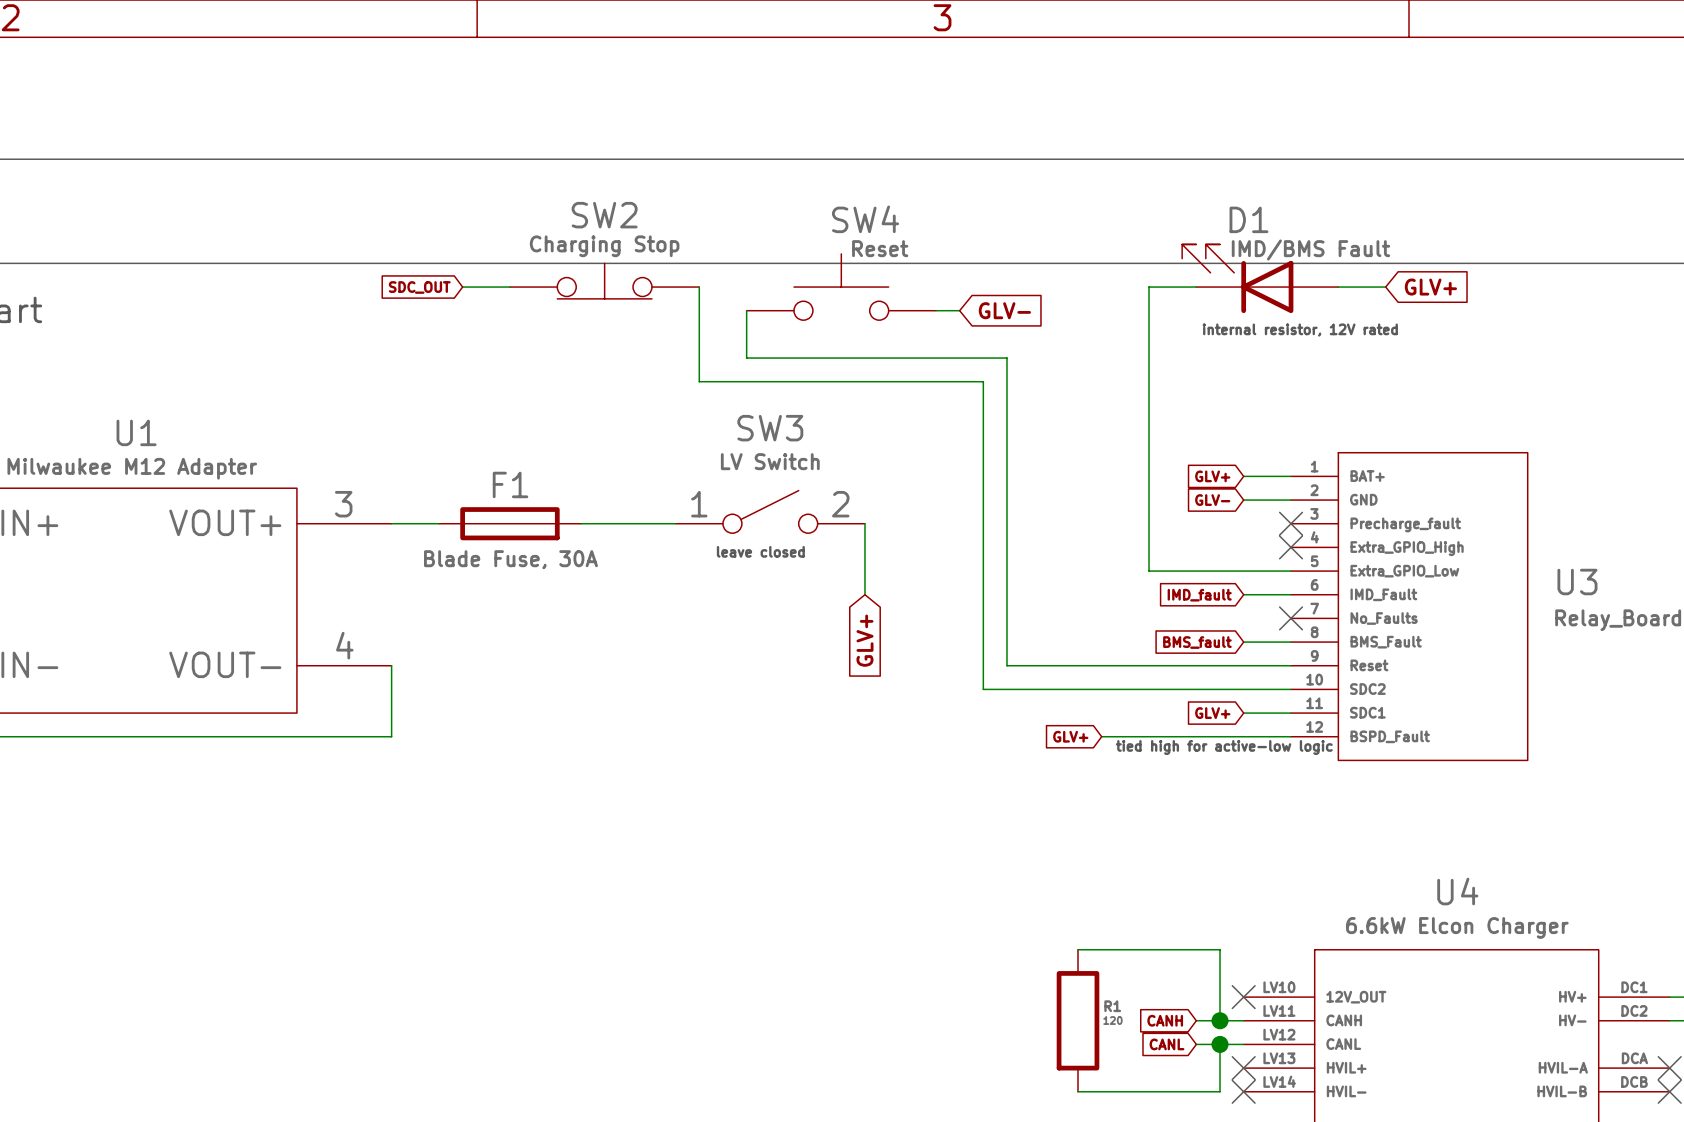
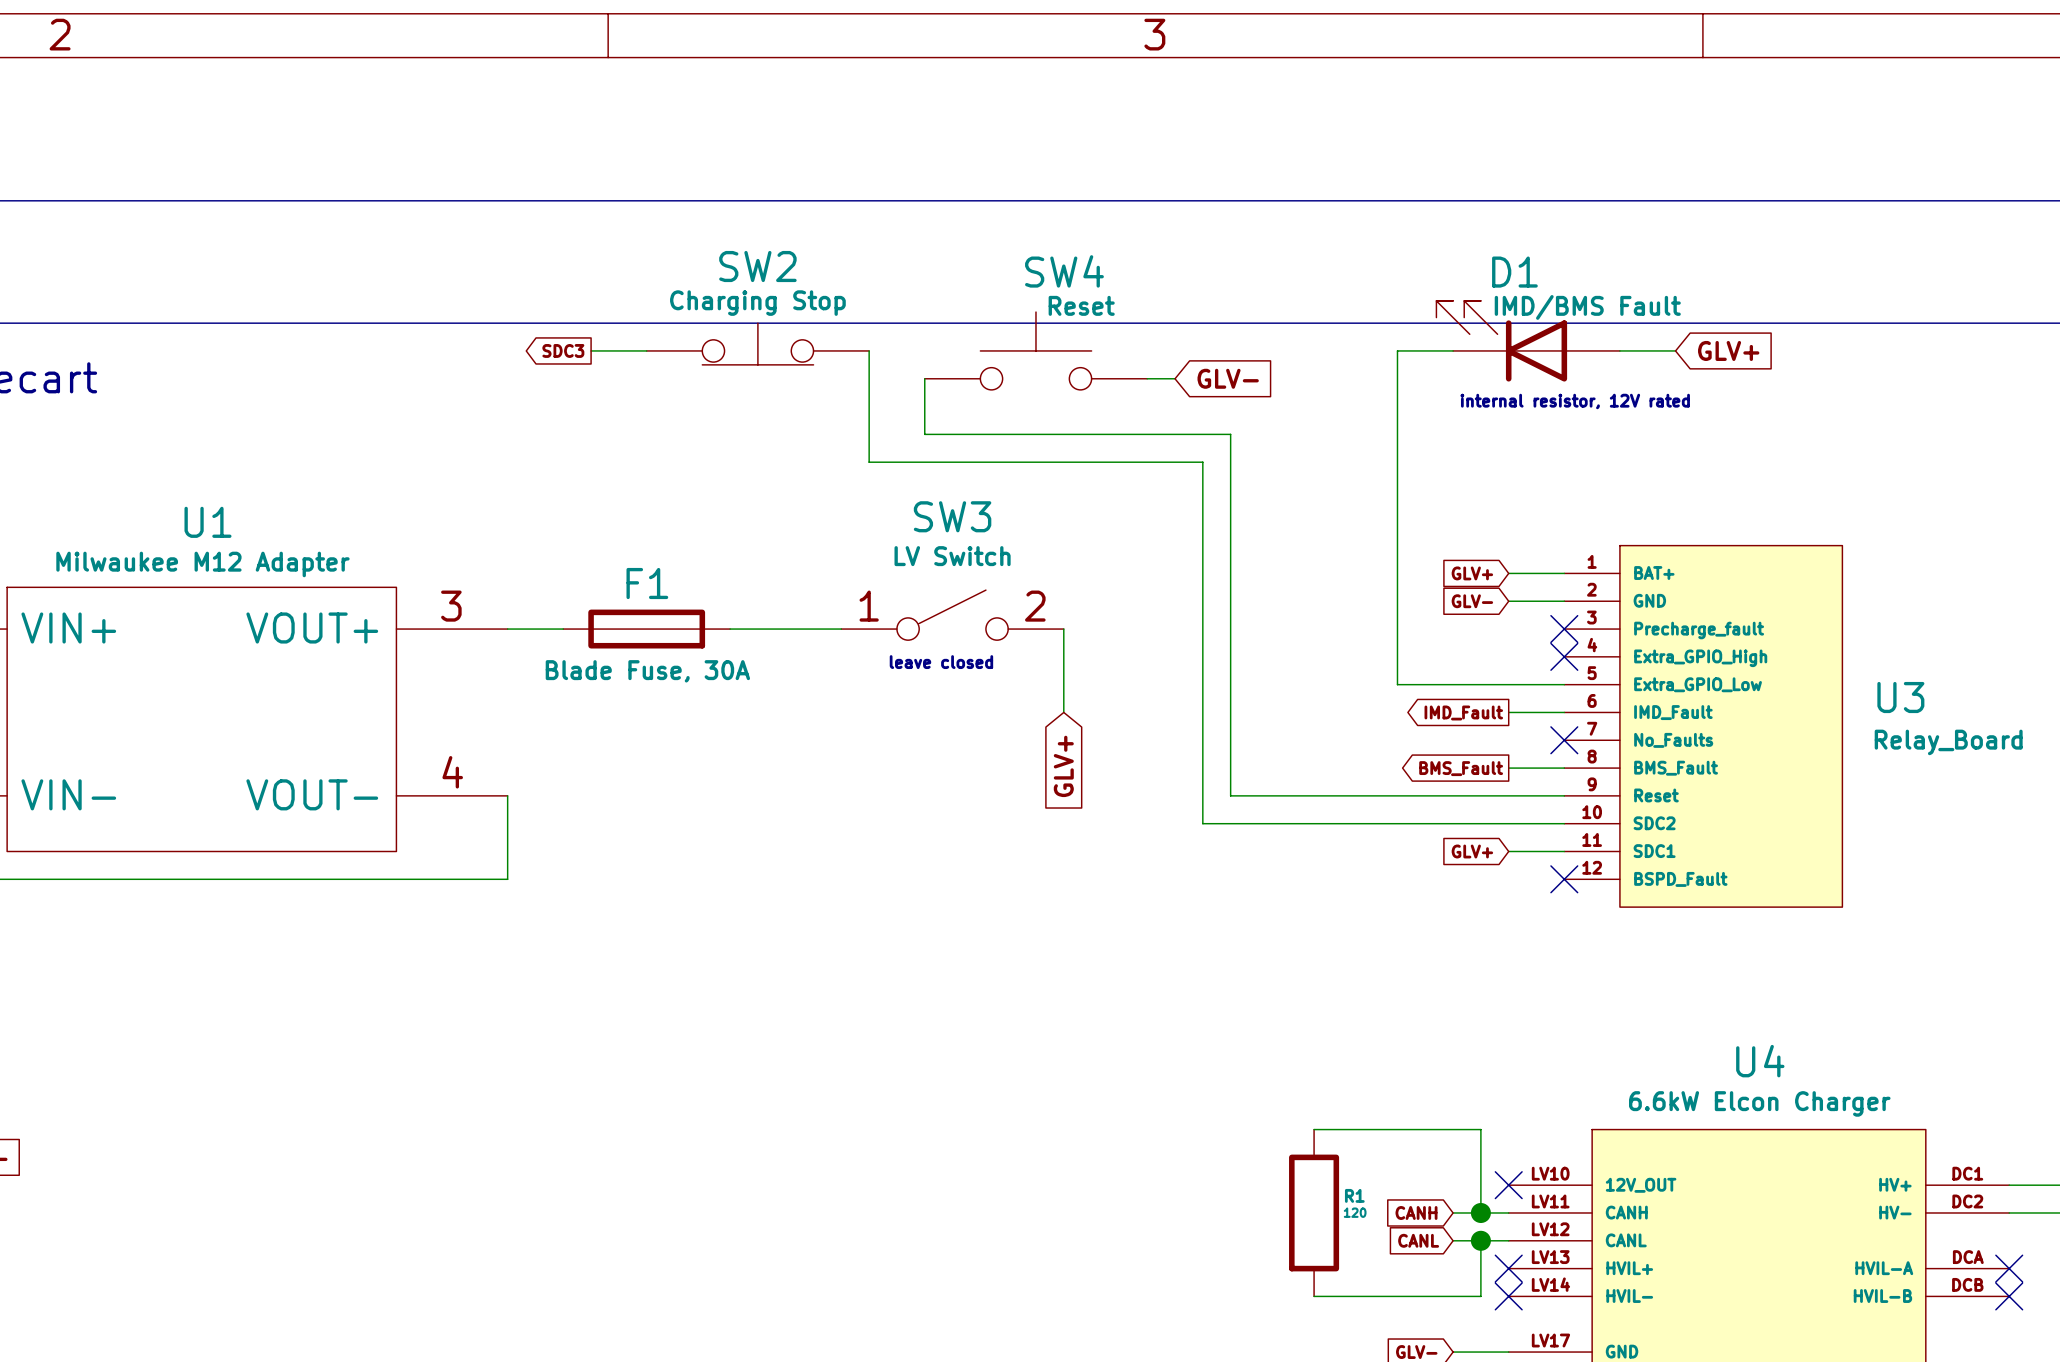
global label shape: input (419, 287) -> output (563, 350)
global label: SDC_OUT (419, 287) -> SDC3 (563, 350)
global label shape: input (1199, 595) -> output (1463, 712)
global label: IMD_fault (1199, 595) -> IMD_Fault (1463, 712)
global label shape: input (1197, 642) -> output (1461, 768)
global label: BMS_fault (1197, 642) -> BMS_Fault (1461, 768)
global label: GLV+ (1070, 736) -> none
wire: (1101, 736) (1291, 736) -> none
no-connect mark: none -> (1564, 879)
text: tied high for active-low logic (1224, 747) -> none

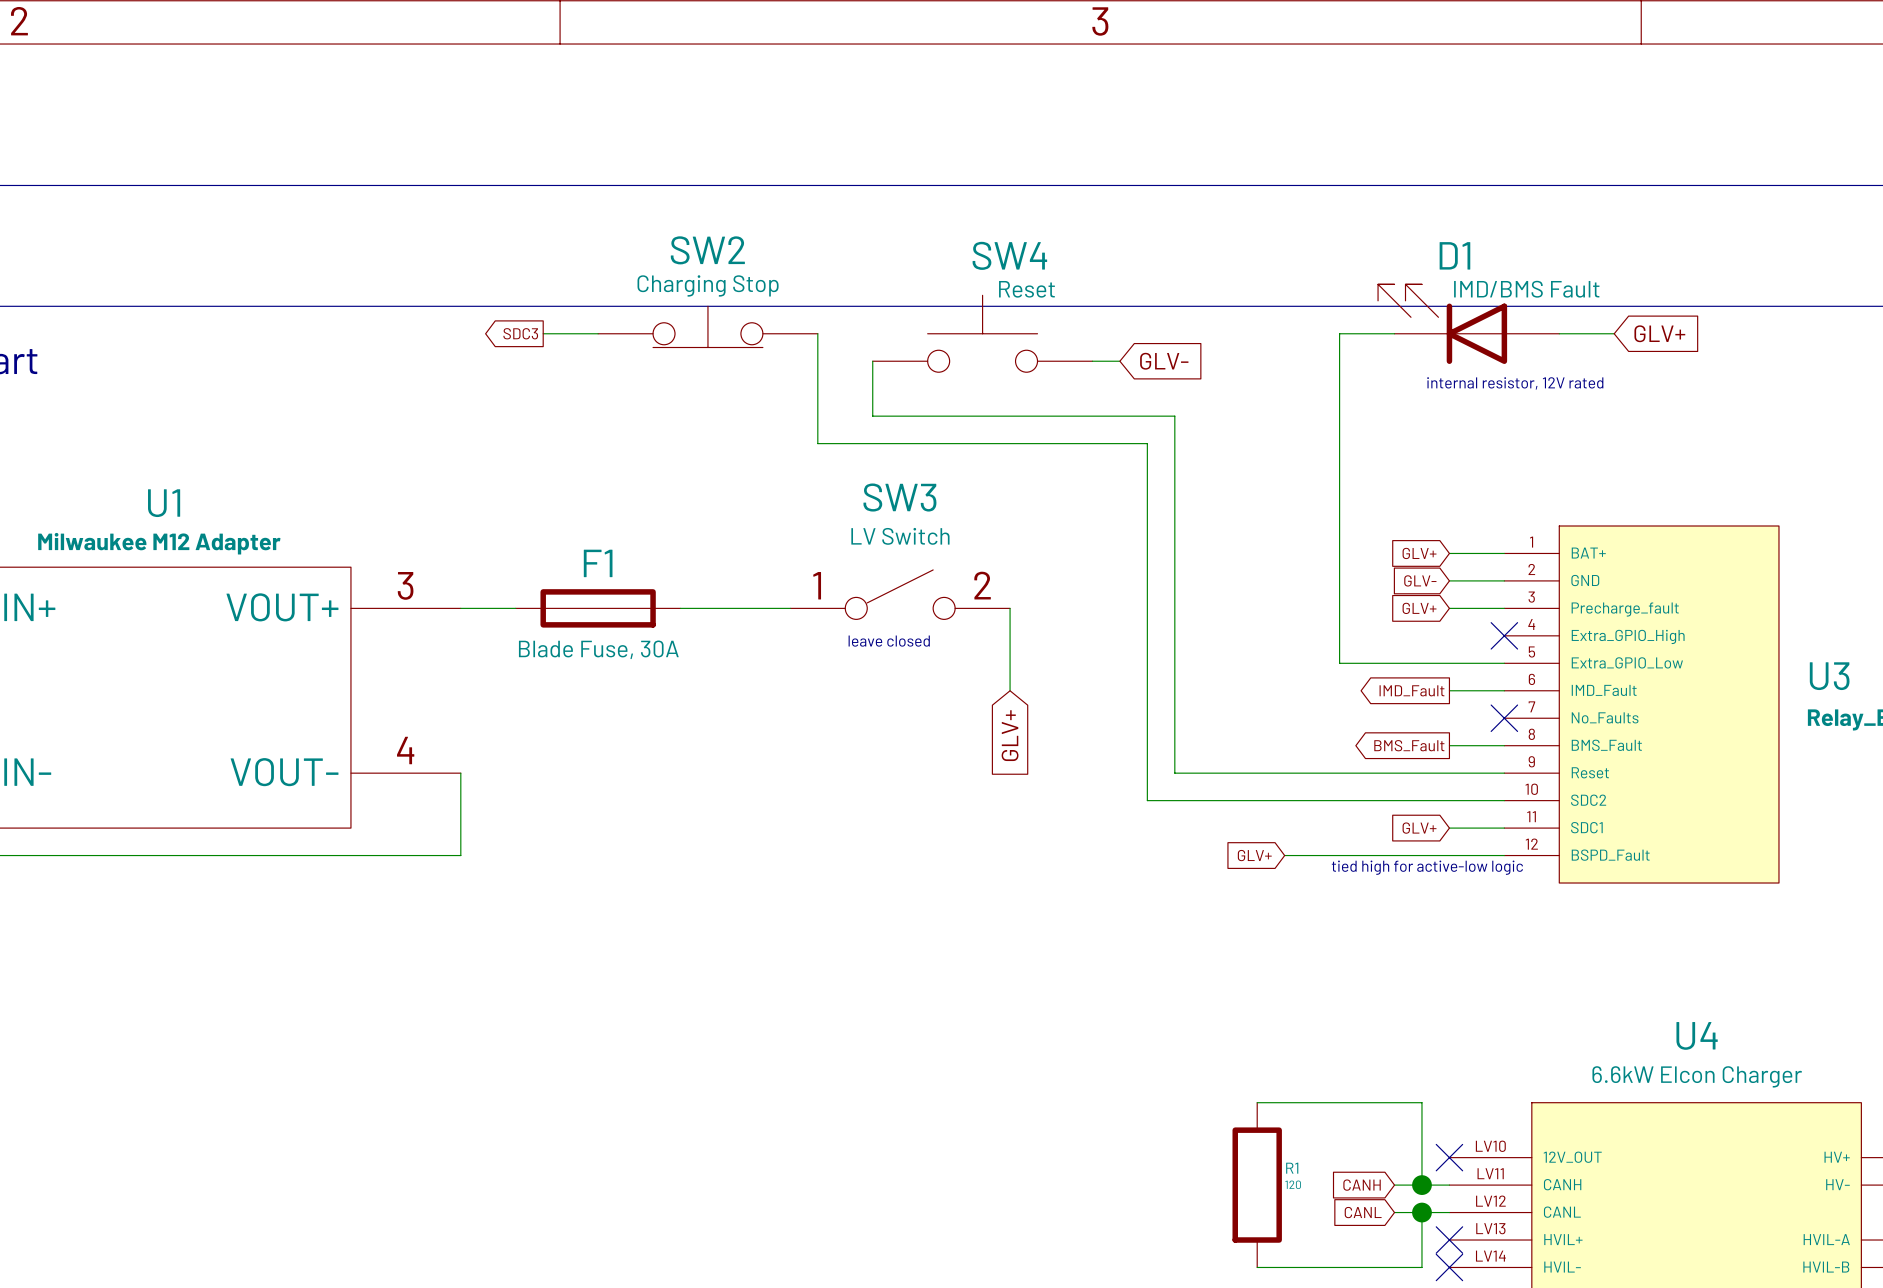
global label: none -> GLV+ (1419, 608)
wire: none -> (1449, 608) (1504, 608)
no-connect mark: (1564, 629) -> none
global label: none -> GLV+ (1254, 855)
wire: none -> (1284, 855) (1504, 855)
no-connect mark: (1564, 879) -> none
text: none -> tied high for active-low logic (1427, 867)

